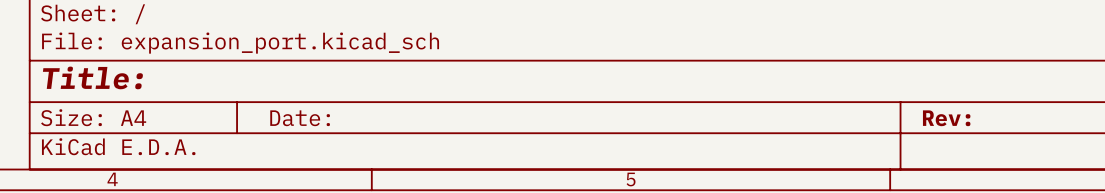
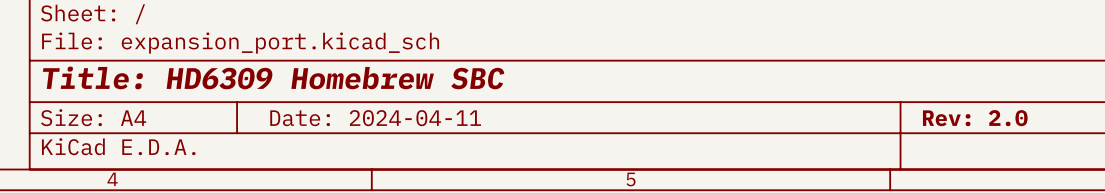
title block: Title: (92, 77) -> Title: HD6309 Homebrew SBC (273, 77)
title block: Date: (300, 118) -> Date: 2024-04-11 (375, 118)
title block: Rev: (946, 118) -> Rev: 2.0 (975, 118)

